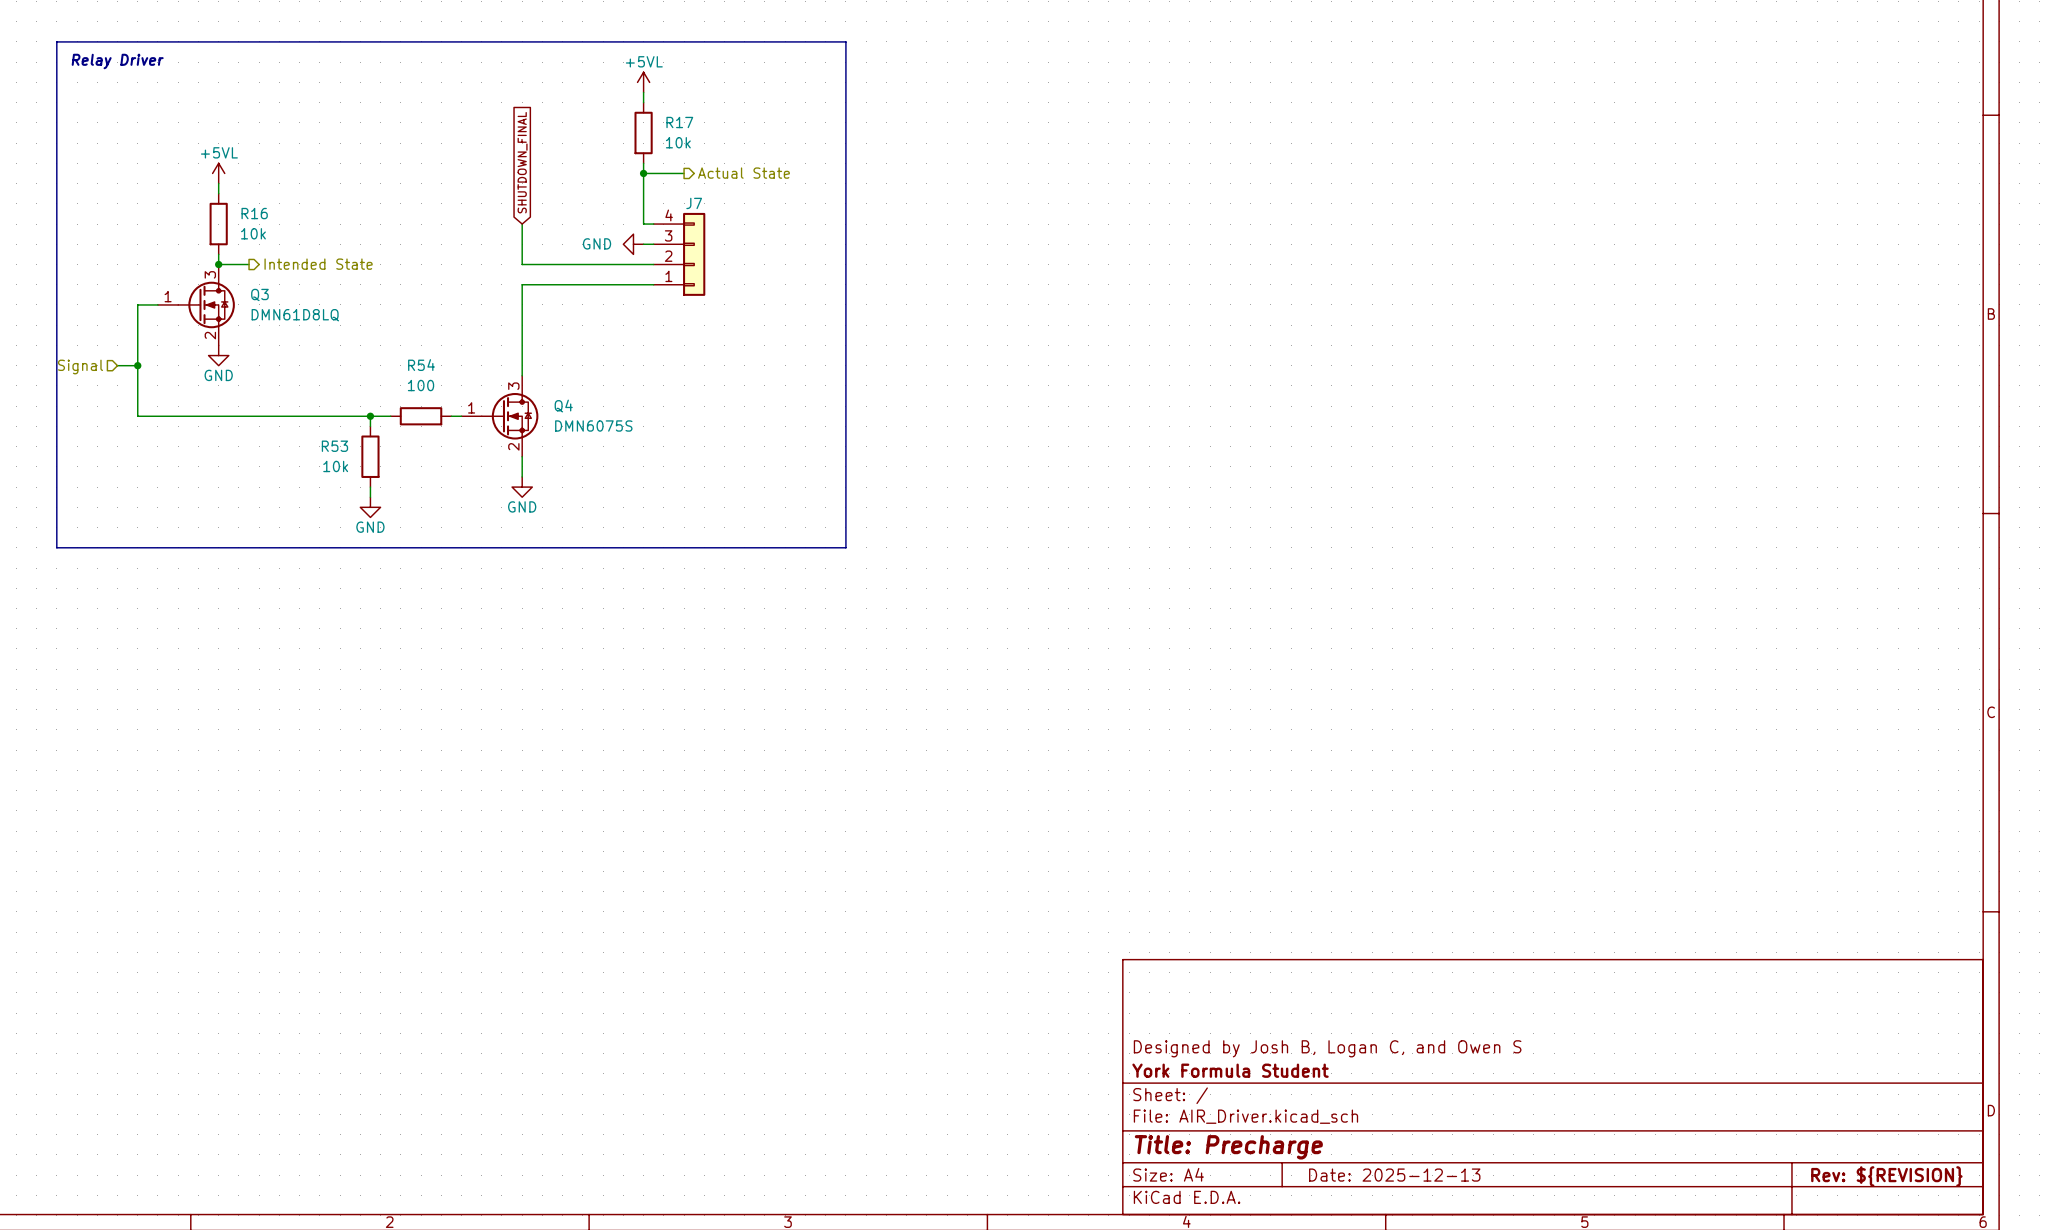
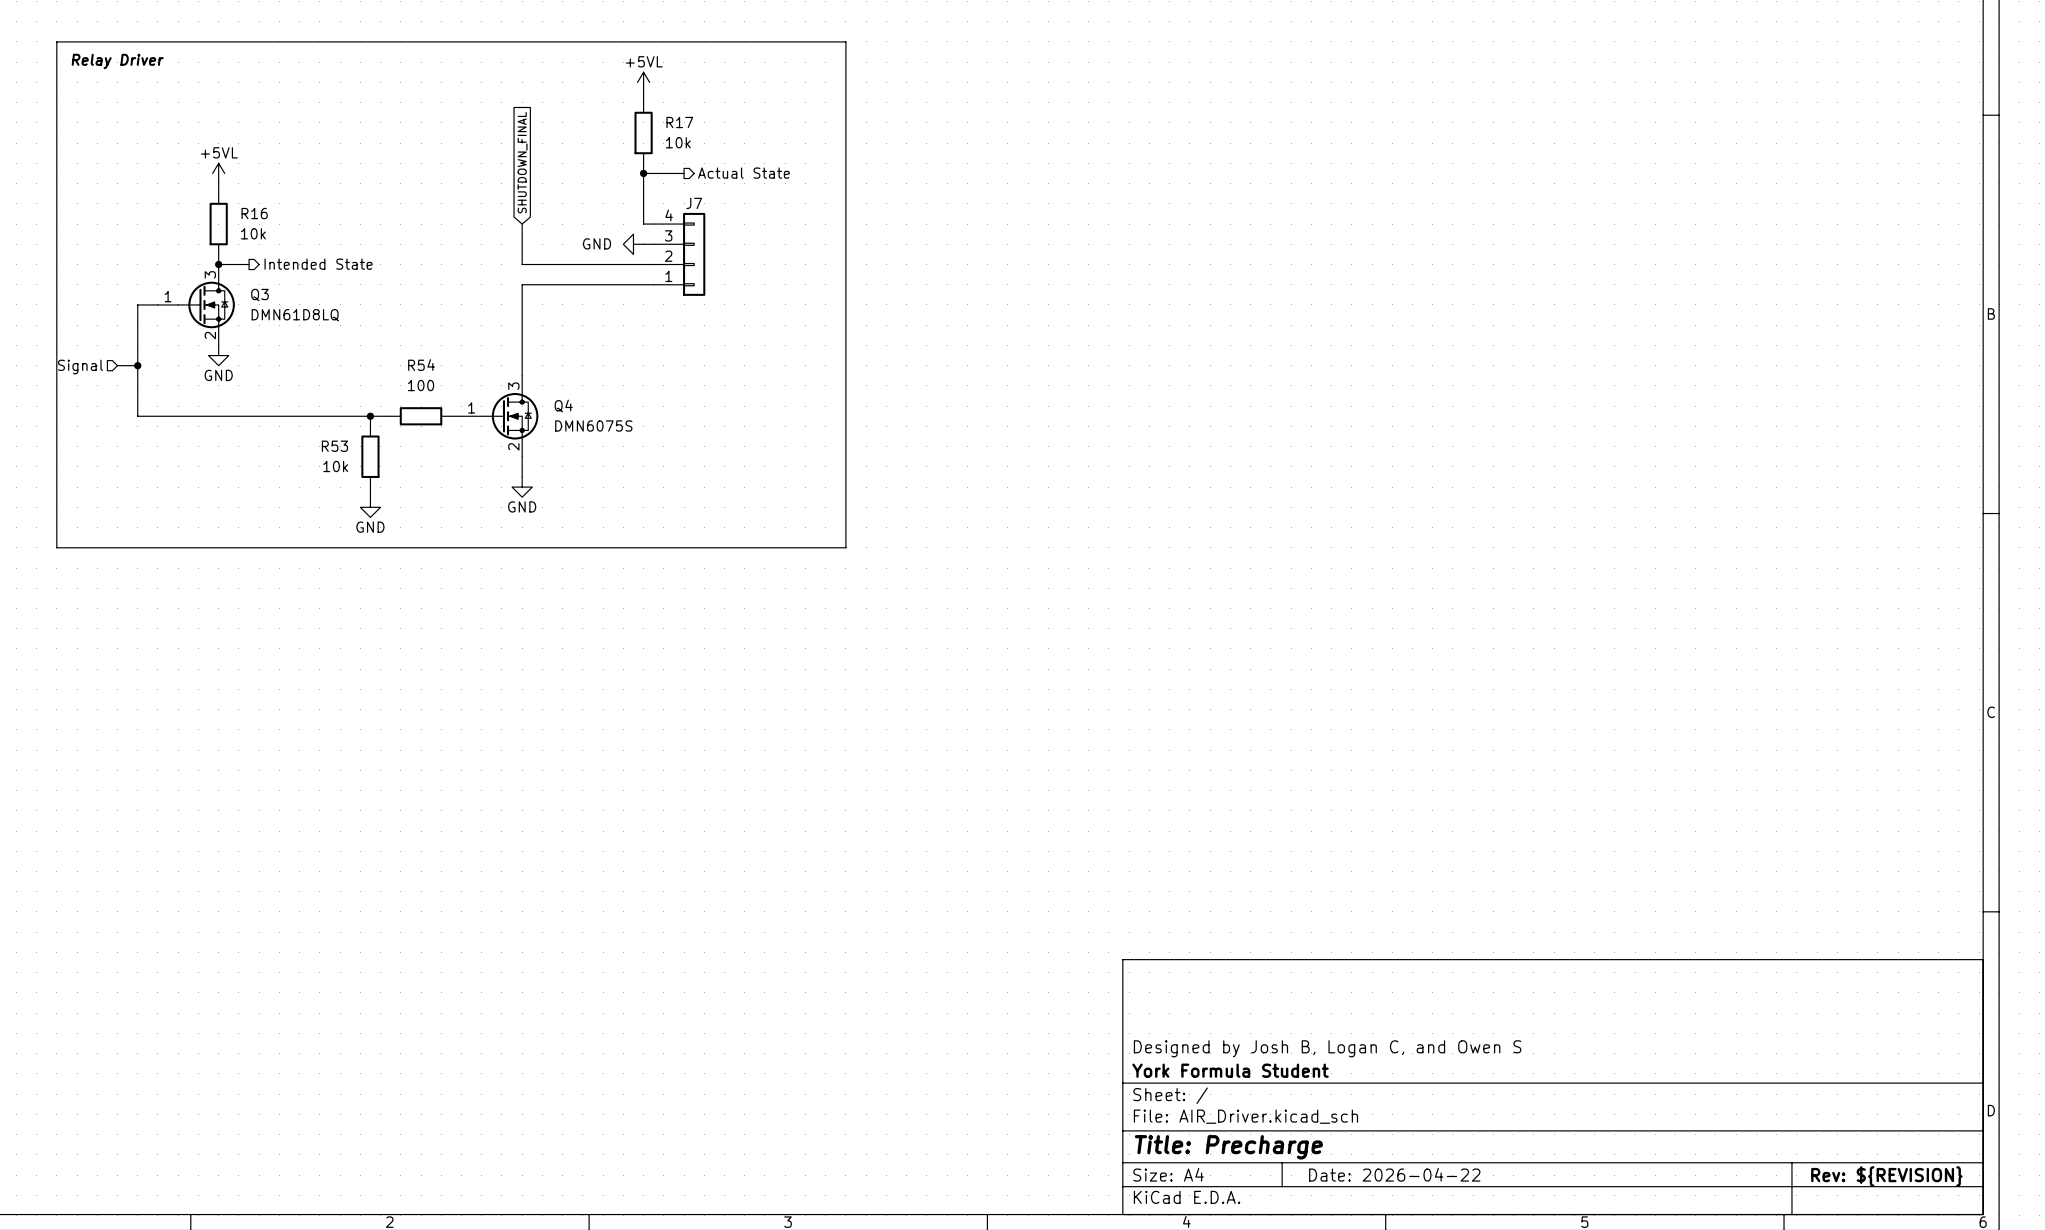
title block: Date: 2025-12-13 (1394, 1175) -> Date: 2026-04-22 (1394, 1174)

